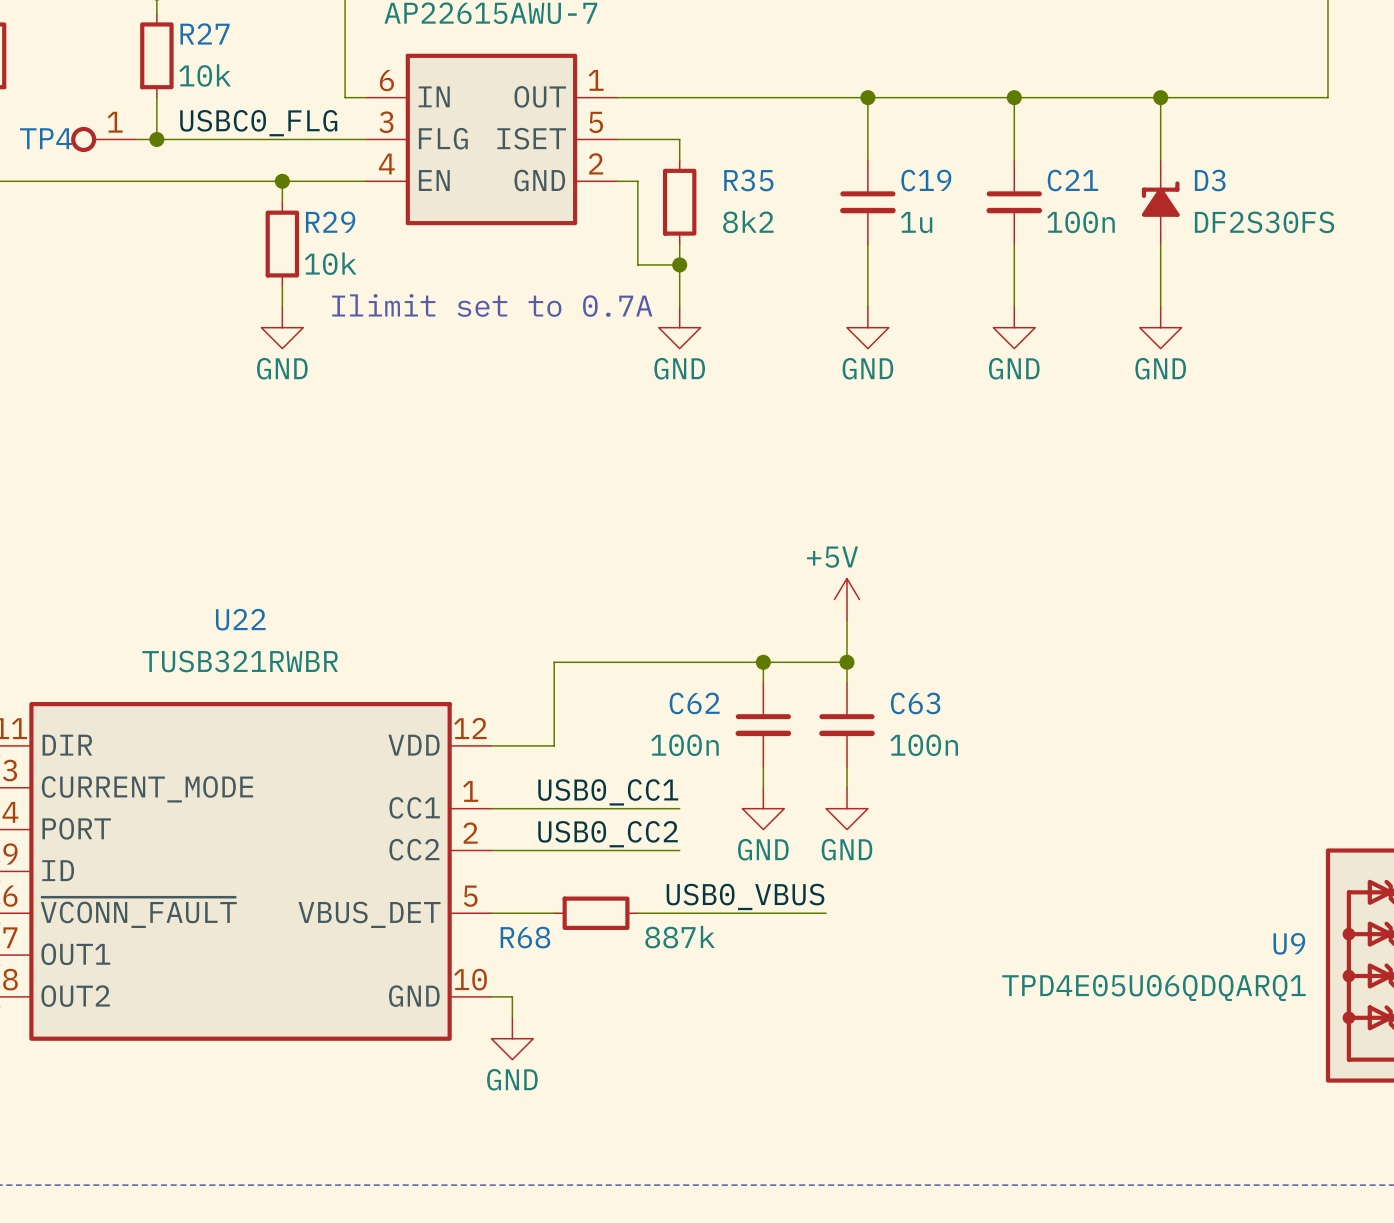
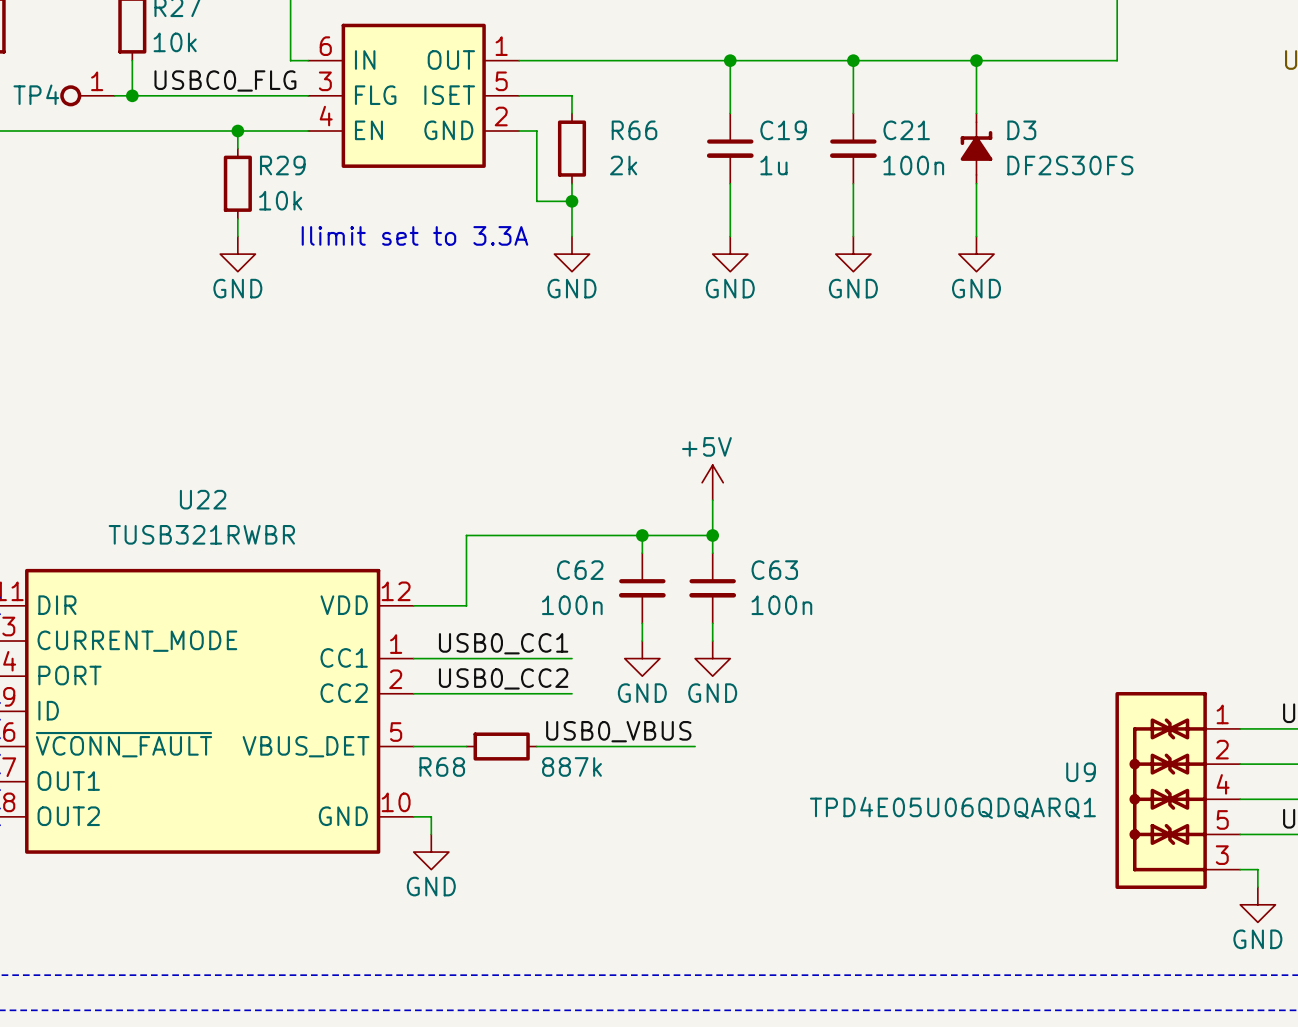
R35 name: R35 (748, 180) -> R66 (634, 130)
R35 text: 8k2 (748, 221) -> 2k (623, 165)
text: Ilimit set to 0.7A (492, 305) -> Ilimit set to 3.3A (414, 235)

